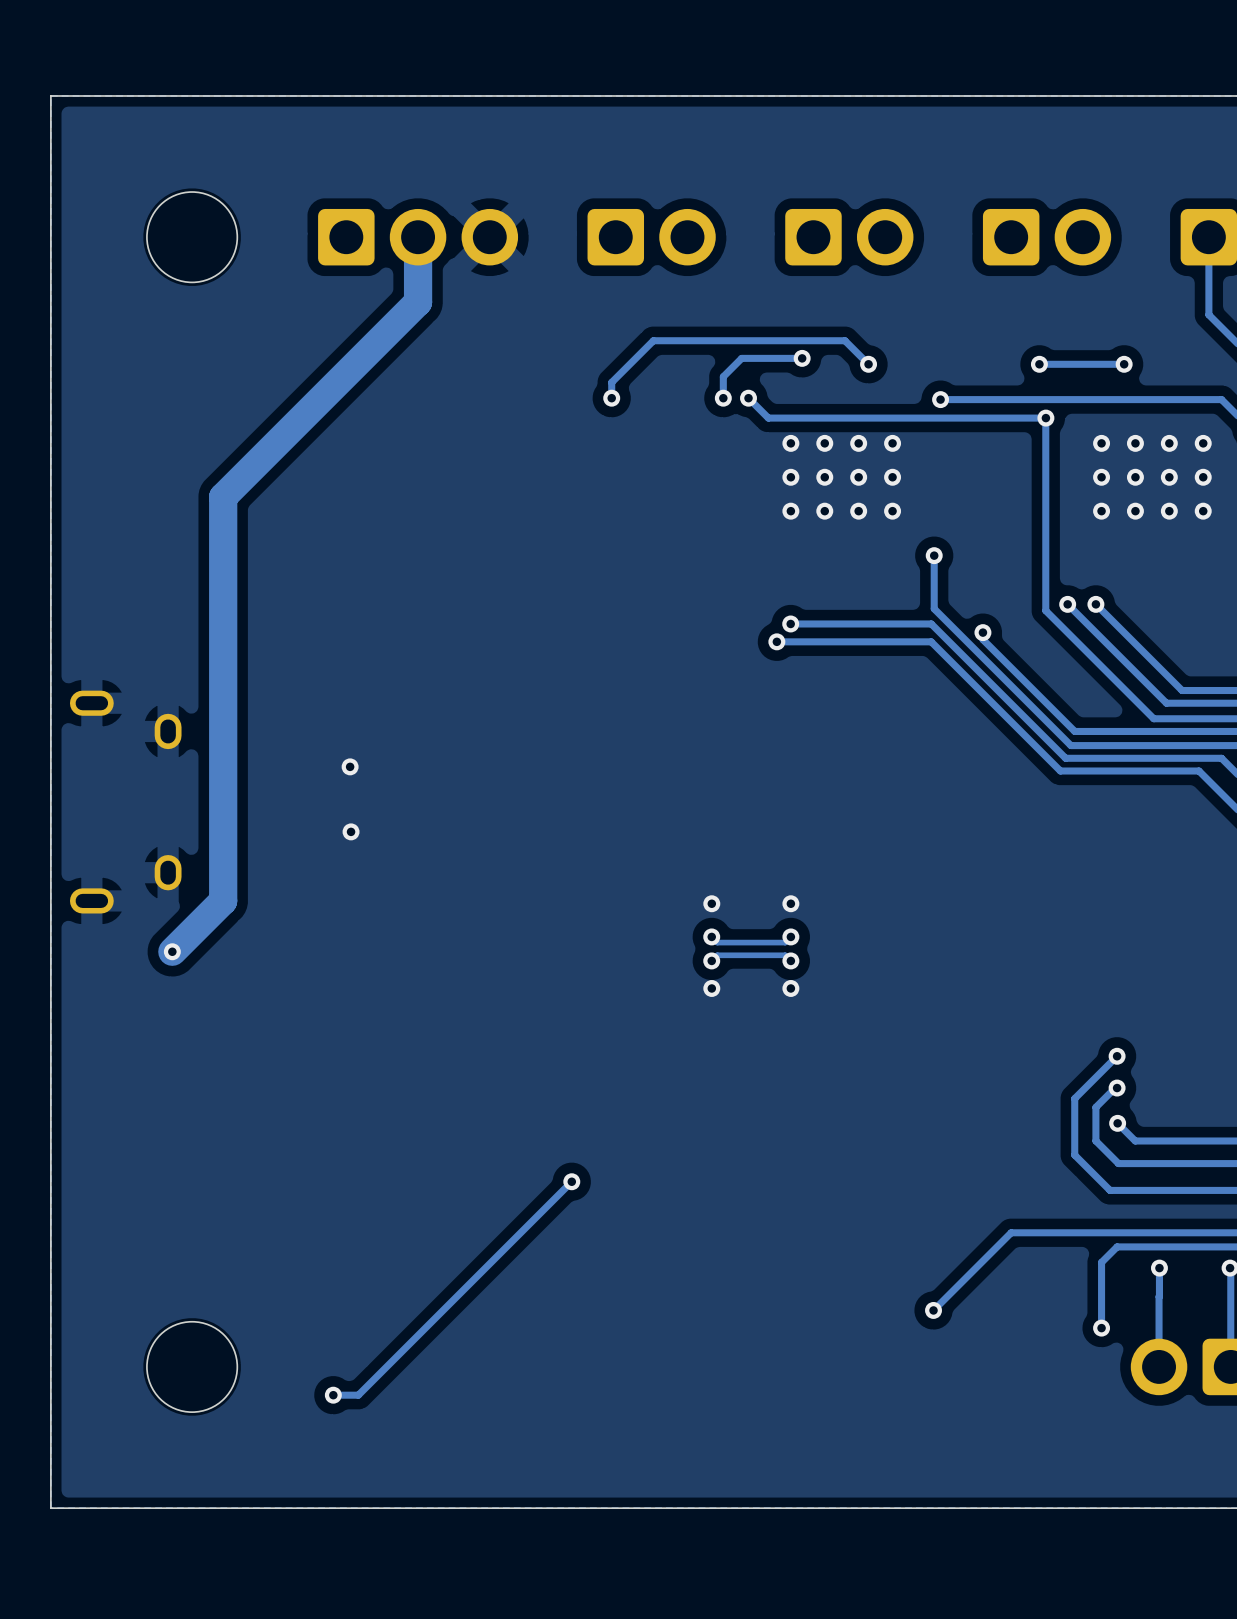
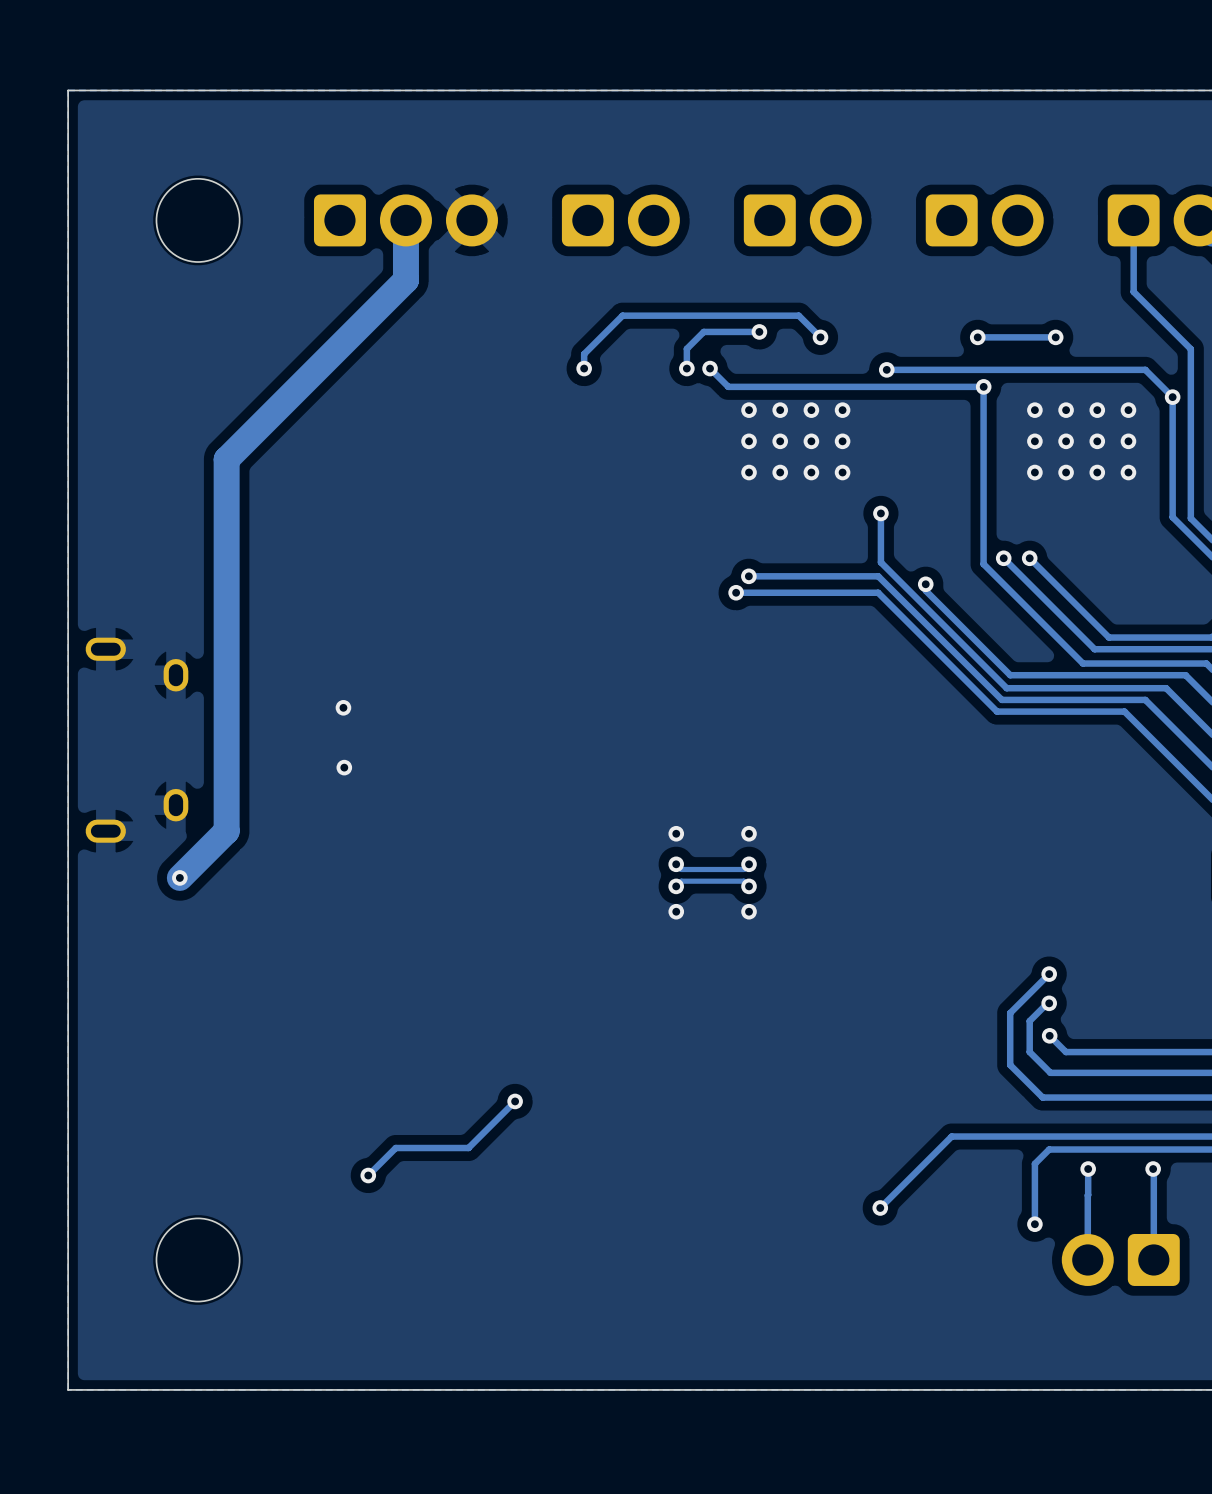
track: (571, 1181) (358, 1395) (333, 1395) -> none
via position: (571, 1181) -> (515, 1101)
track: none -> (515, 1101) (468, 1148) (395, 1148) (368, 1175)
via: none -> (368, 1175)
via: (333, 1395) -> none

